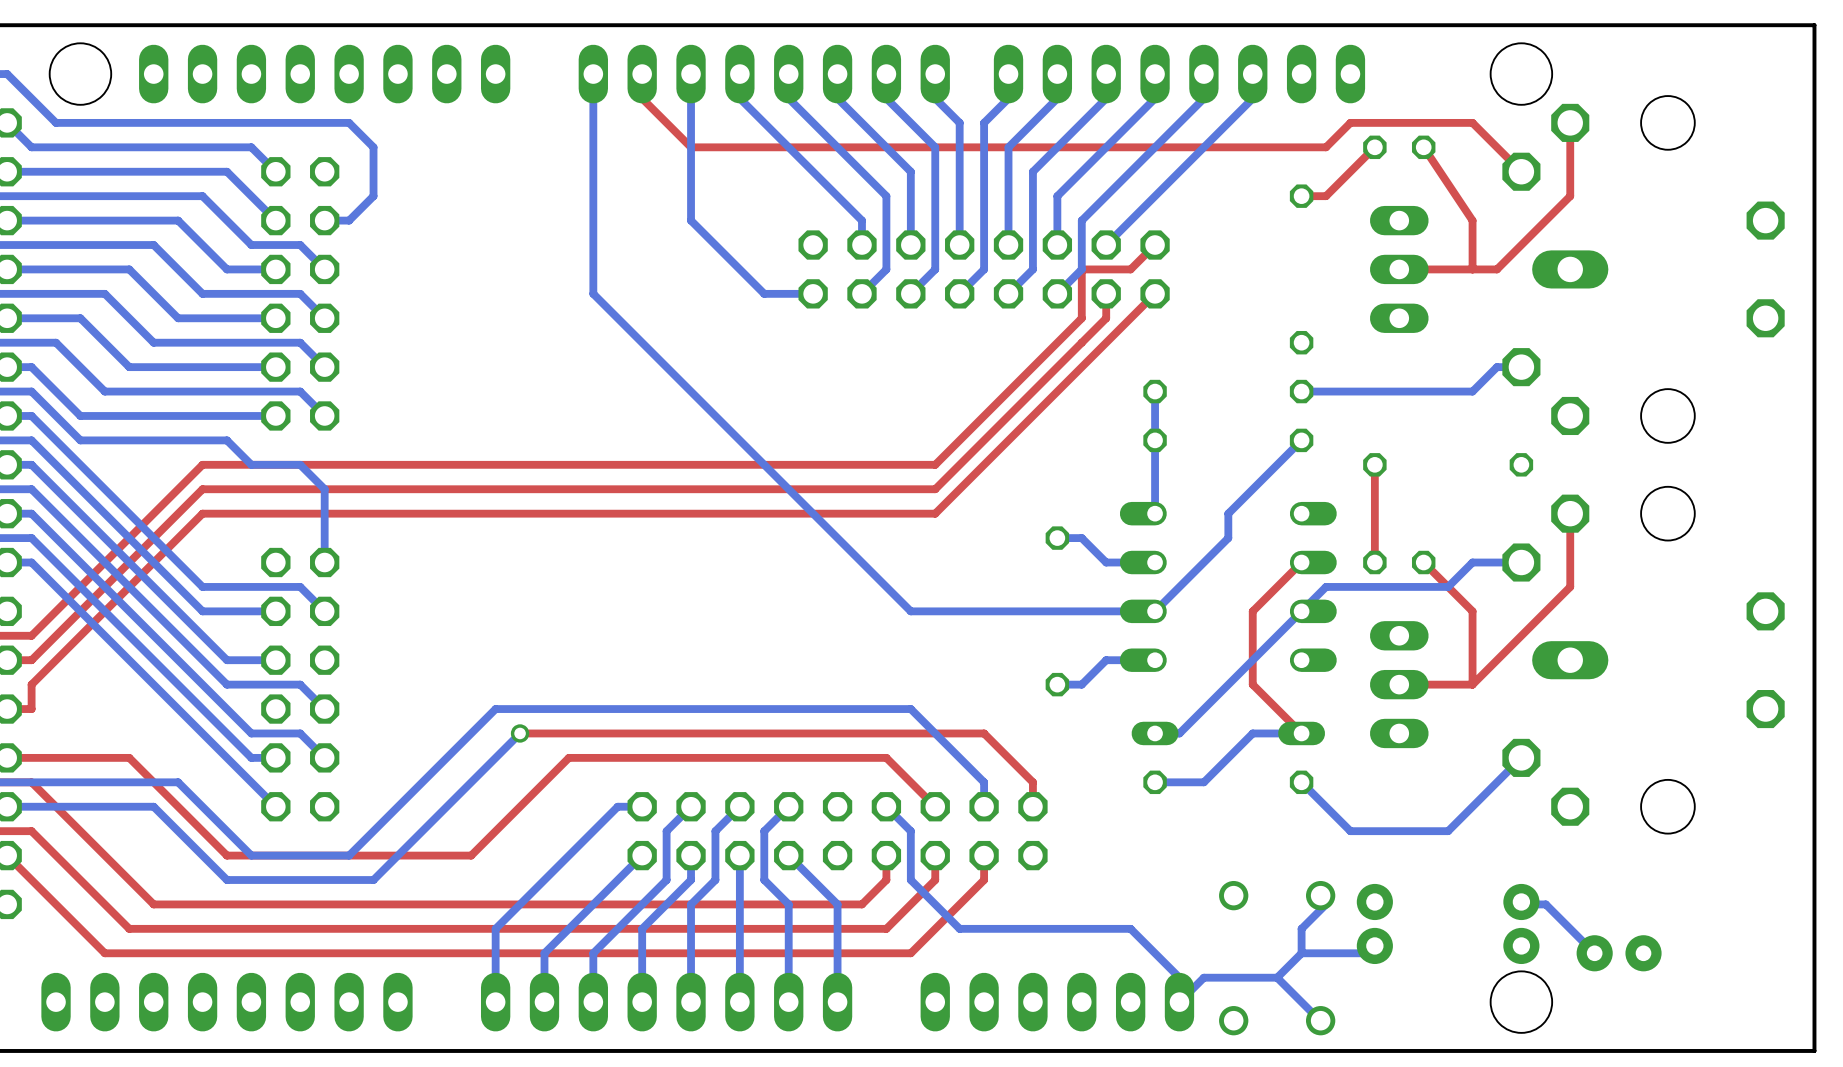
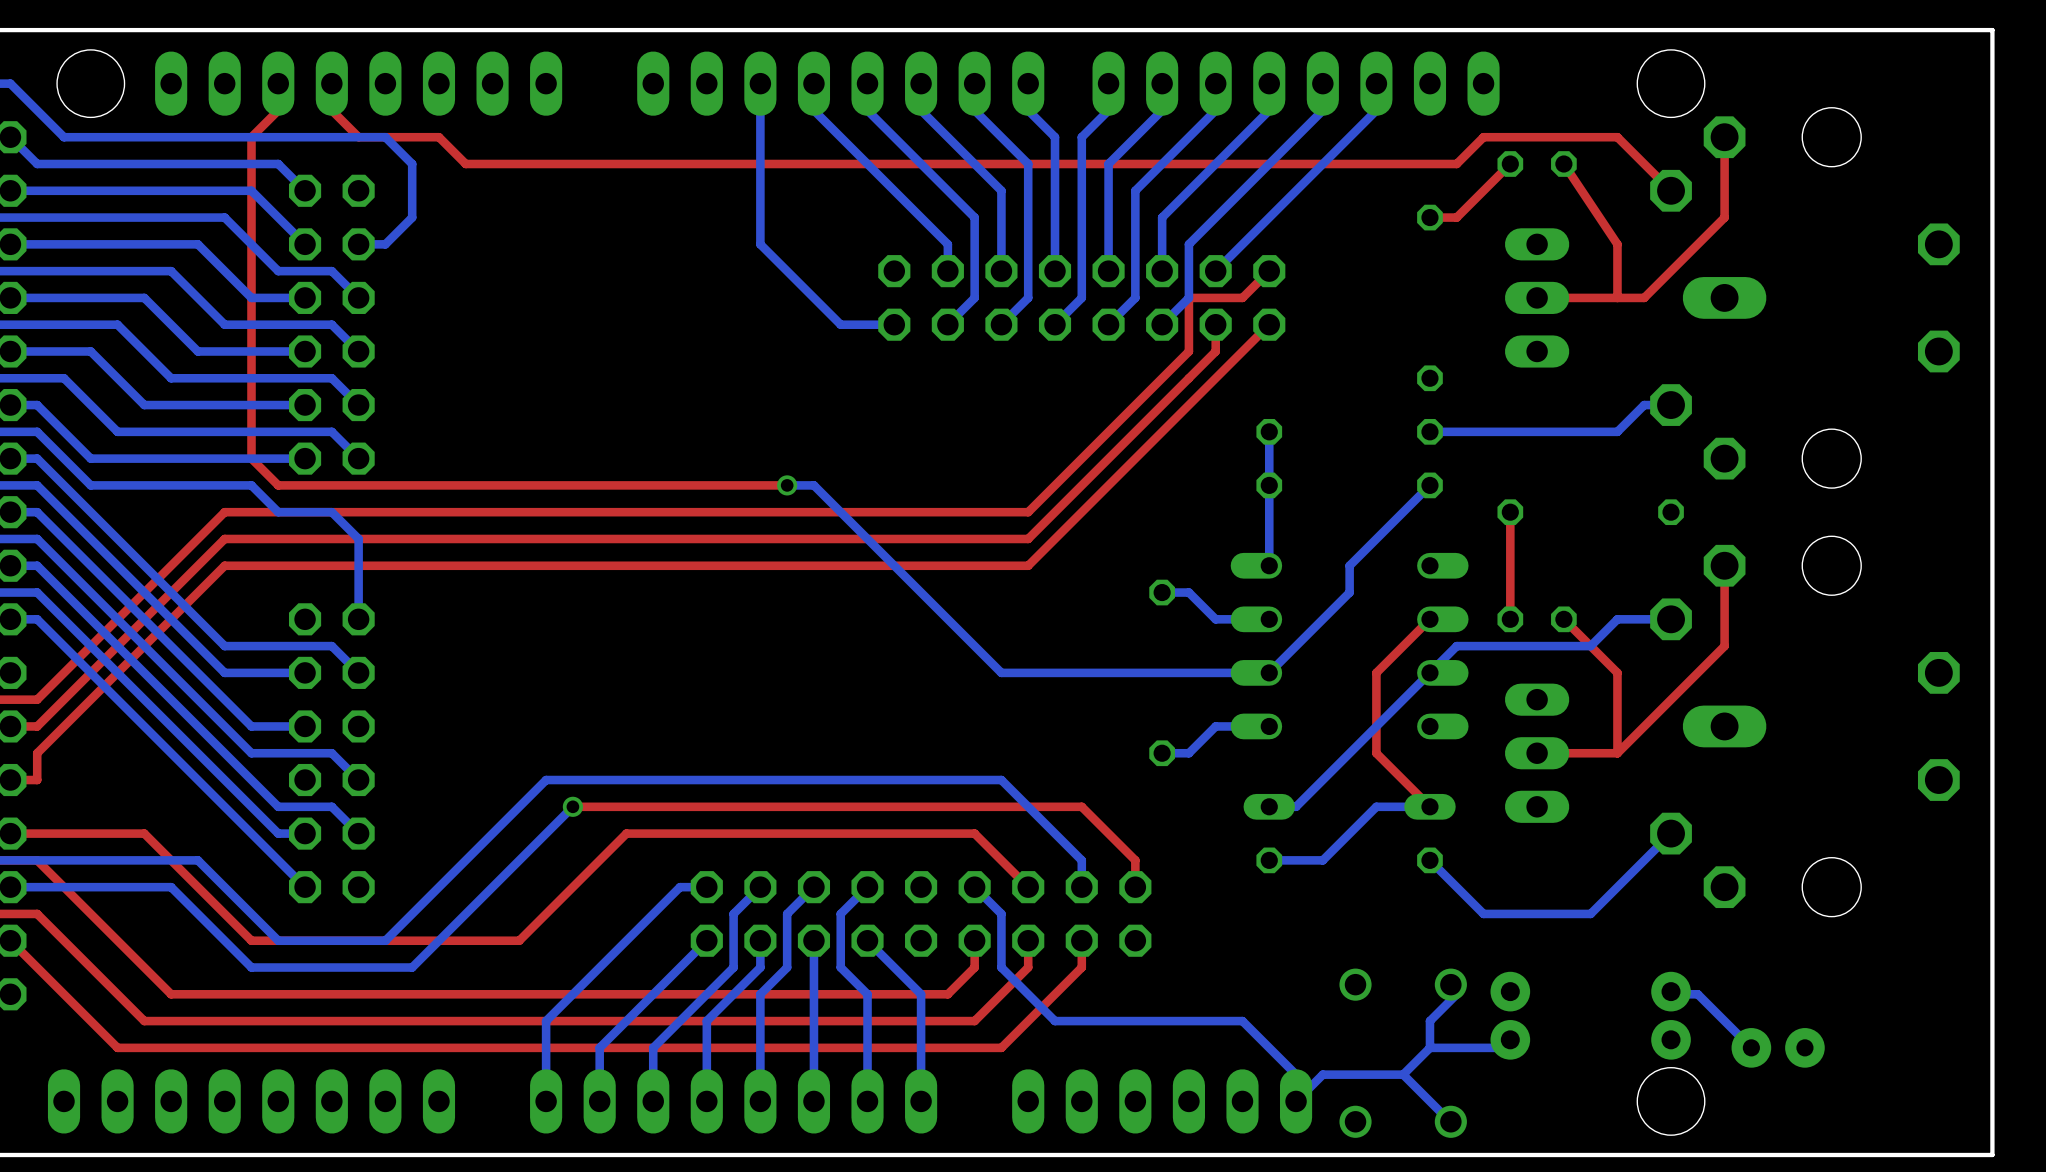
top track: none -> (278, 83) (278, 110) (251, 137) (251, 458) (278, 485) (787, 485)
bottom track: (593, 74) (593, 293) (739, 440) -> (787, 485) (813, 485)
top track: (642, 98) (691, 147) -> (331, 83) (331, 110) (358, 137) (438, 137) (465, 164) (760, 164)
via: none -> (787, 485)

